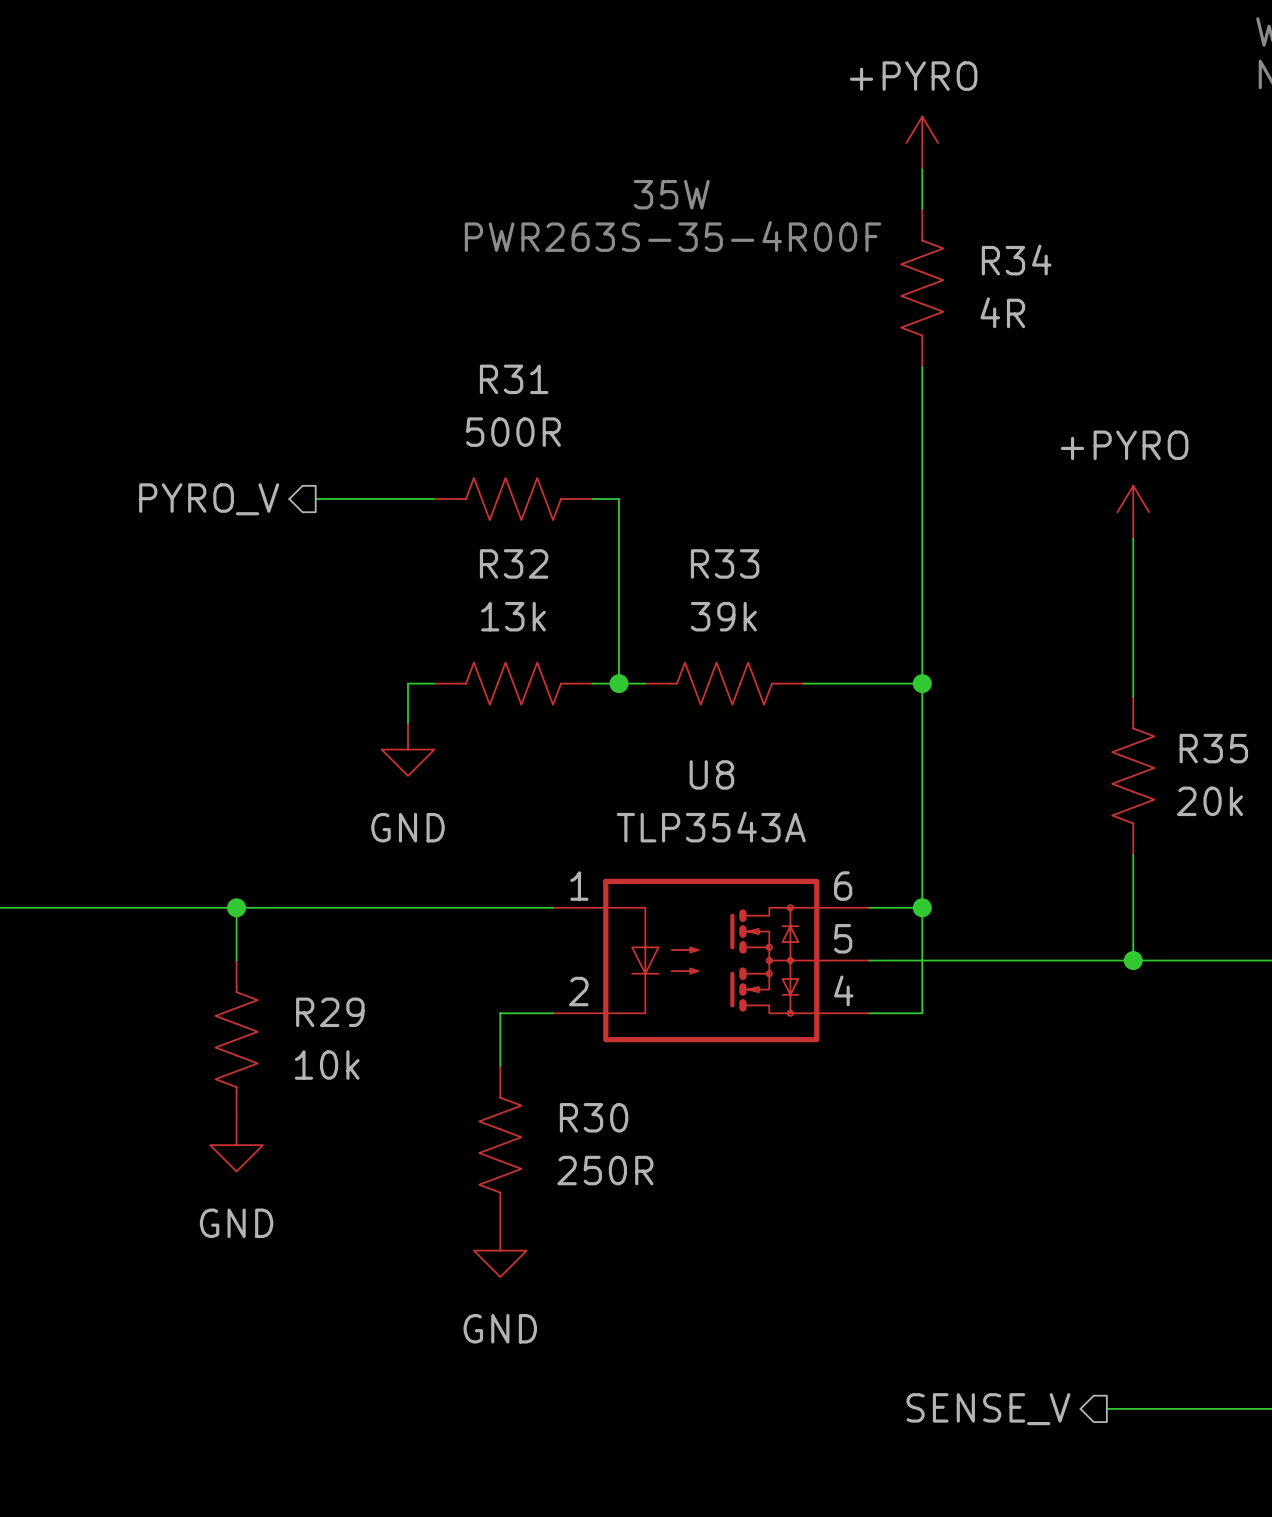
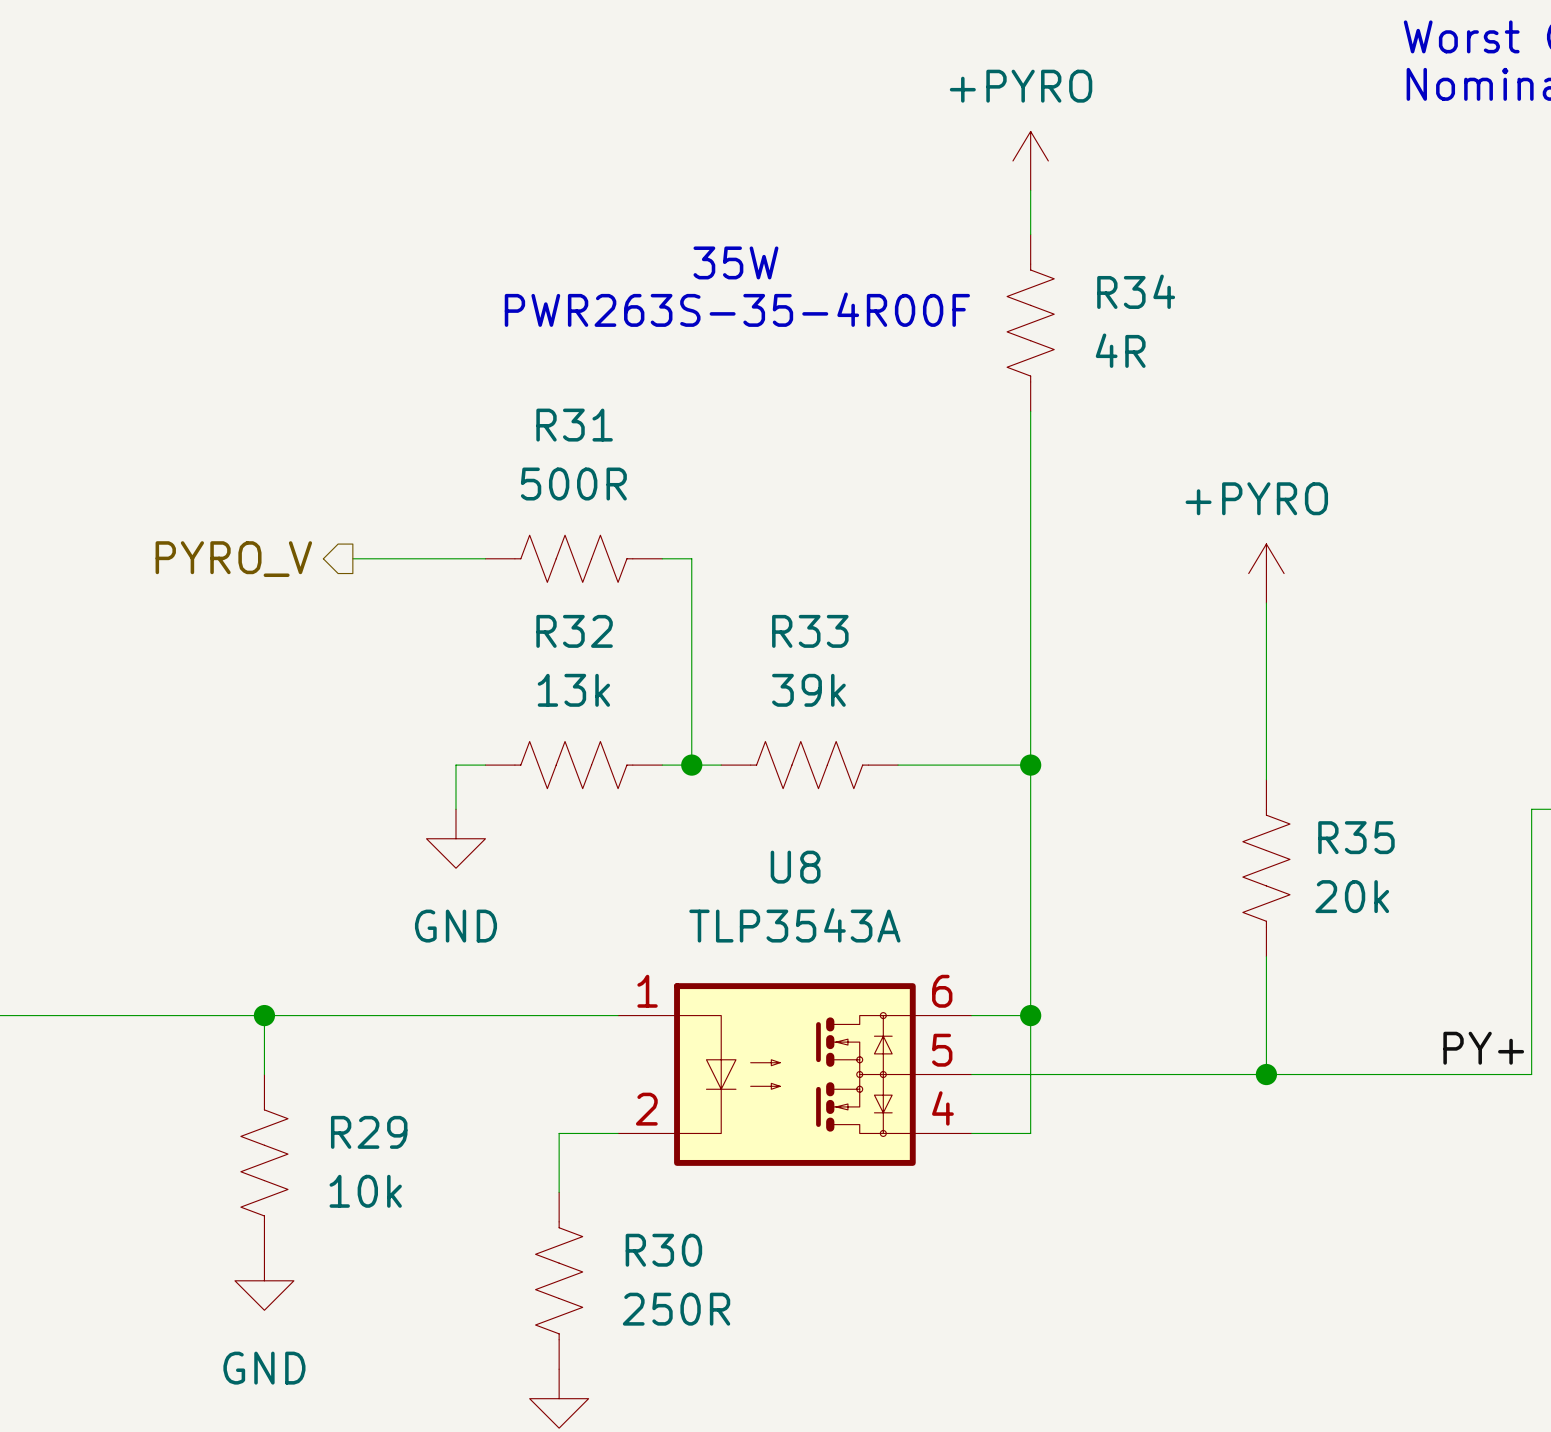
text position: 35W (671, 194) -> 35W (735, 262)
text position: PWR263S-35-4R00F (672, 236) -> PWR263S-35-4R00F (737, 309)

